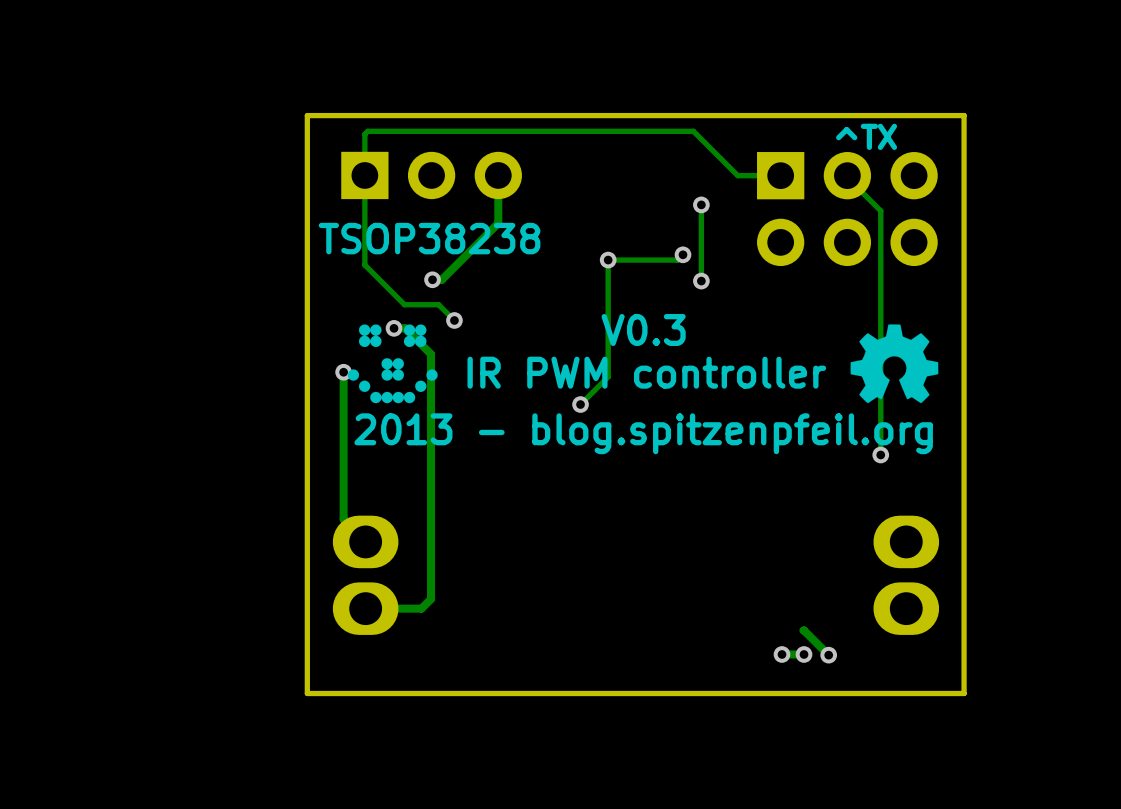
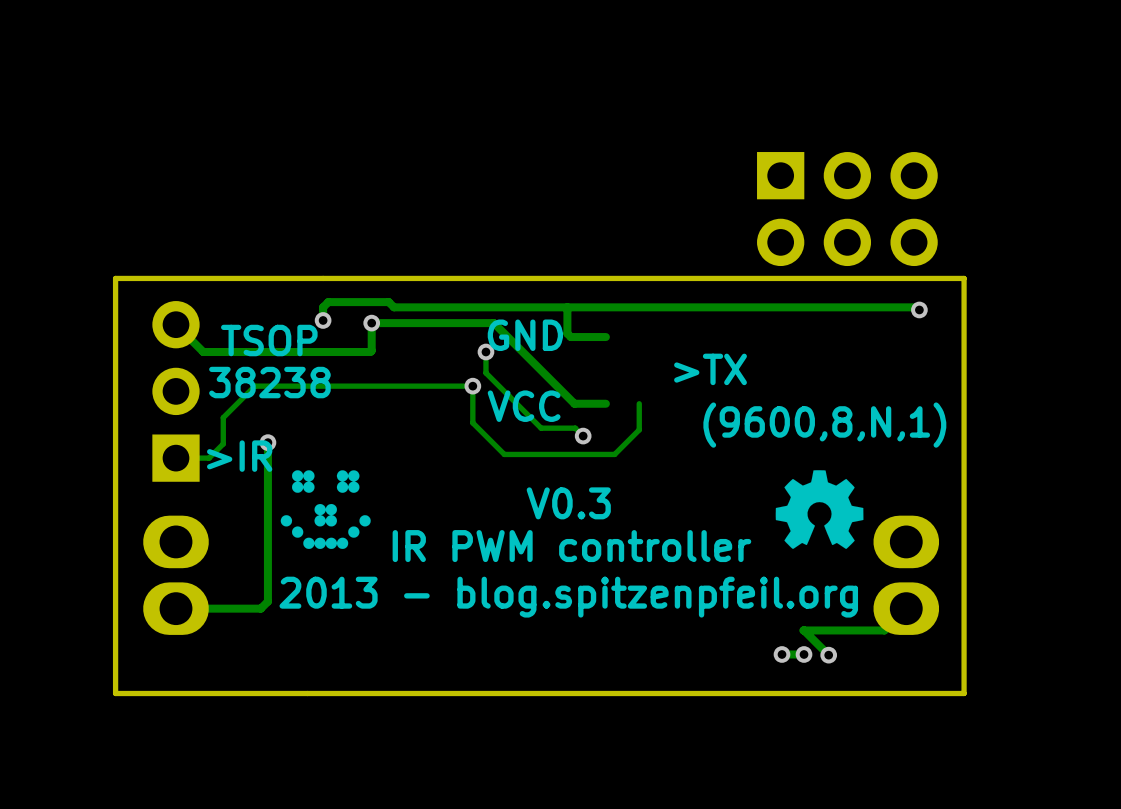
text: TX (878, 136) -> none
line: (854, 137) (846, 129) (838, 137) -> none
part rotation: 0° (431, 175) -> 90° counterclockwise (176, 391)
part position: (431, 175) -> (176, 391)
track: (498, 175) (498, 223) (441, 279) (432, 279) -> none
track: (780, 175) (737, 175) (693, 131) (367, 131) (364, 134) (364, 265) (404, 304) (438, 304) (454, 320) -> none
track: (847, 175) (880, 210) (880, 454) -> none
track: (701, 204) (701, 281) -> none
via: (701, 204) -> none
text: TSOP38238 (429, 238) -> none
track: (682, 254) (677, 260) (608, 260) (608, 376) (580, 404) -> none
via: (682, 254) -> none
via: (608, 260) -> none
board edge: (964, 278) (964, 115) (307, 115) (307, 693) -> (964, 278) (115, 278) (115, 693) (307, 693)
via: (432, 279) -> none
via: (701, 281) -> none
track: none -> (567, 307) (567, 333) (570, 337) (605, 337)
track: none -> (919, 309) (916, 307) (394, 307) (388, 302) (328, 302) (323, 307) (323, 320)
via: none -> (919, 309)
via: none -> (323, 320)
via: (454, 320) -> none
track: none -> (371, 323) (370, 352) (203, 352) (176, 324)
track: none -> (371, 323) (493, 323) (574, 403) (605, 403)
track: (394, 328) (405, 328) (431, 354) (431, 599) (421, 608) (366, 608) -> none
via position: (394, 328) -> (371, 323)
text position: V0.3 (643, 329) -> V0.3 (568, 503)
text: none -> GND (525, 335)
text: none -> TSOP (269, 340)
track: none -> (485, 352) (485, 373) (541, 428) (575, 428) (583, 436)
via: none -> (485, 352)
drawing position: (392, 363) -> (325, 509)
drawing position: (894, 363) -> (819, 509)
text: none -> >TX (710, 369)
track: (343, 372) (343, 519) (366, 541) -> none
via: (343, 372) -> none
text position: IR PWM controller (646, 372) -> IR PWM controller (571, 546)
text: none -> 38238 (269, 382)
via: none -> (472, 386)
track: none -> (639, 403) (639, 429) (614, 454) (504, 454) (472, 422) (472, 386) (254, 386) (223, 417) (223, 443) (209, 458) (176, 458)
via position: (580, 404) -> (583, 436)
text: none -> VCC (524, 406)
text: none -> (9600,8,N,1) (824, 425)
text position: 2013 - blog.spitzenpfeil.org (643, 433) -> 2013 - blog.spitzenpfeil.org (568, 597)
track: none -> (267, 442) (267, 601) (260, 608) (176, 608)
via: none -> (267, 442)
via: (880, 454) -> none
text: none -> >IR (239, 456)
part position: (365, 575) -> (176, 575)
track: none -> (906, 608) (884, 630) (804, 630)

